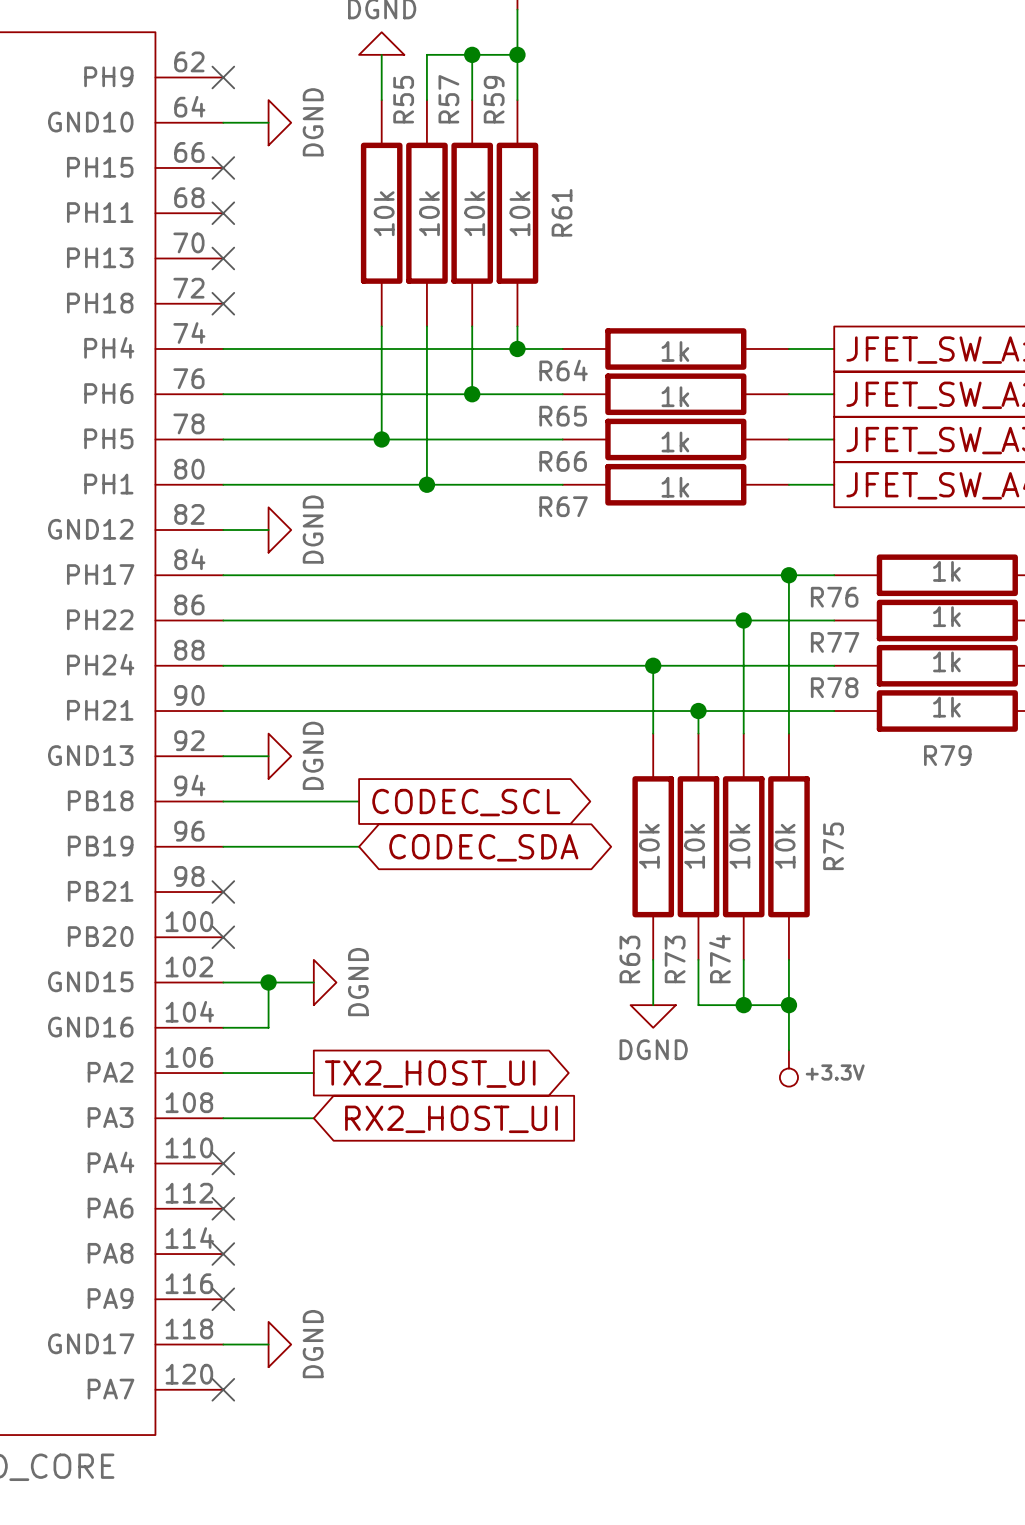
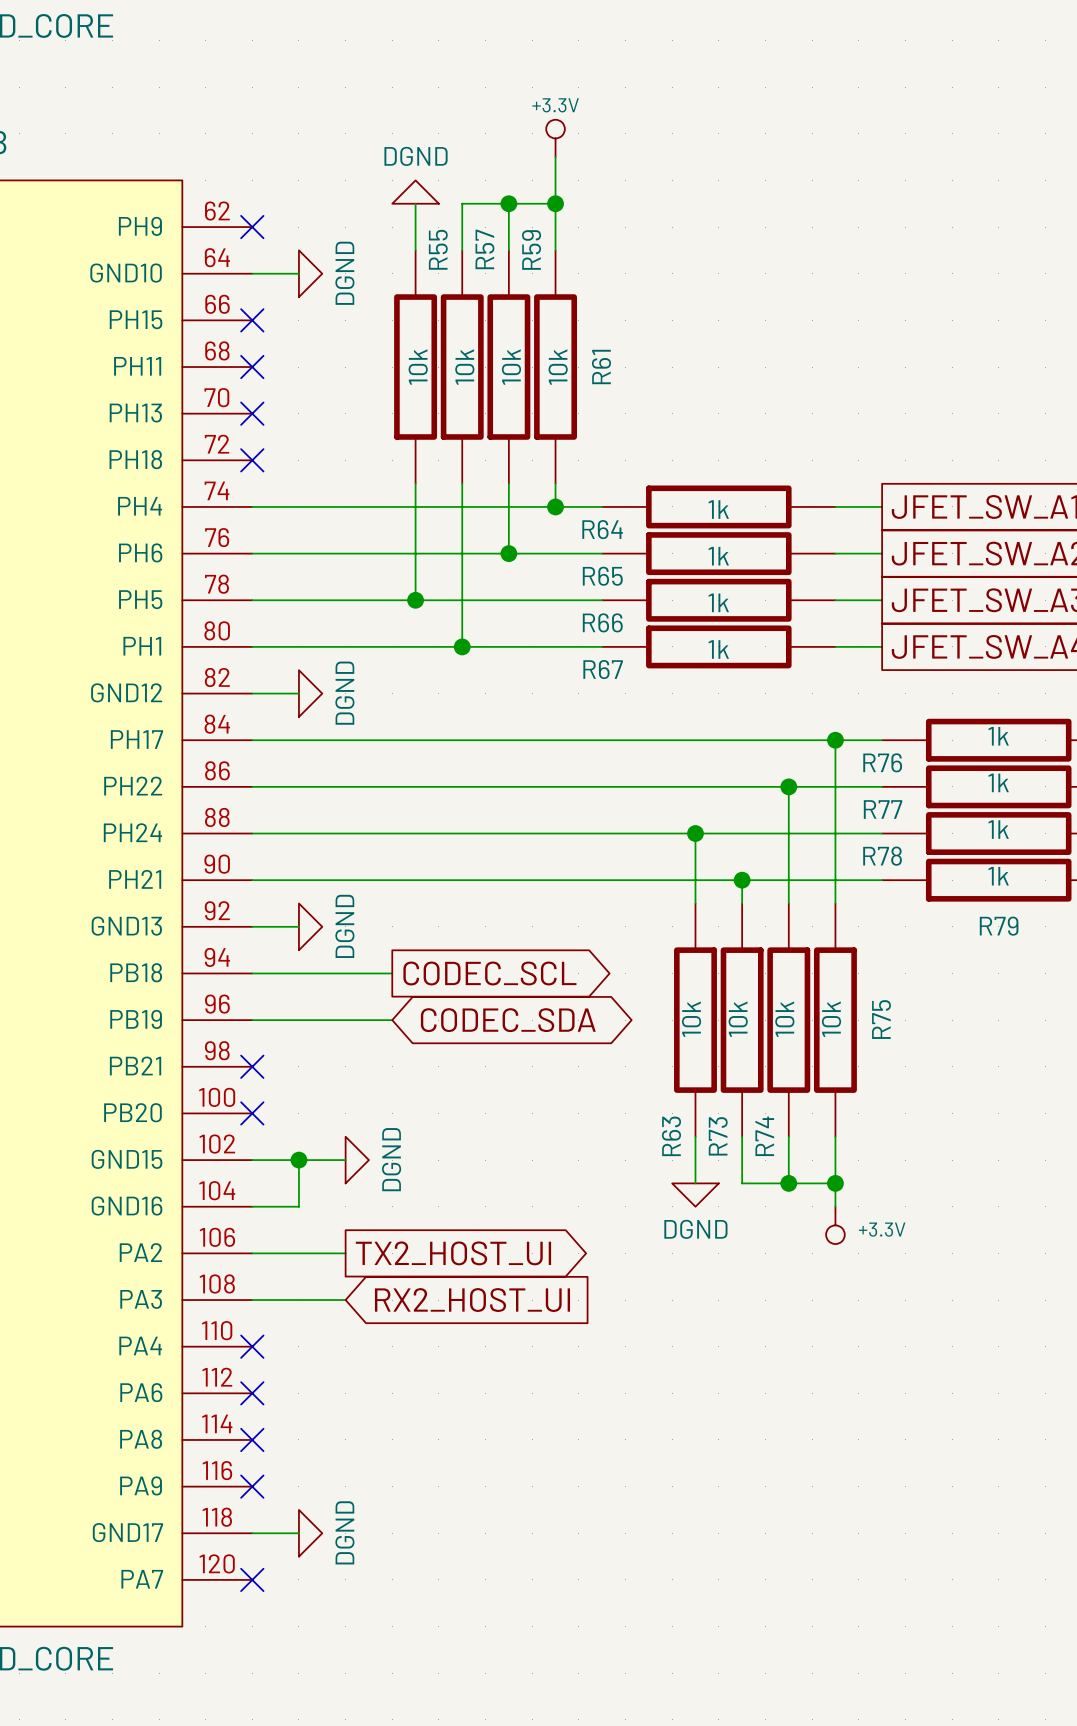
power symbol position: +3.3V (788, 1068) -> +3.3V (835, 1225)

